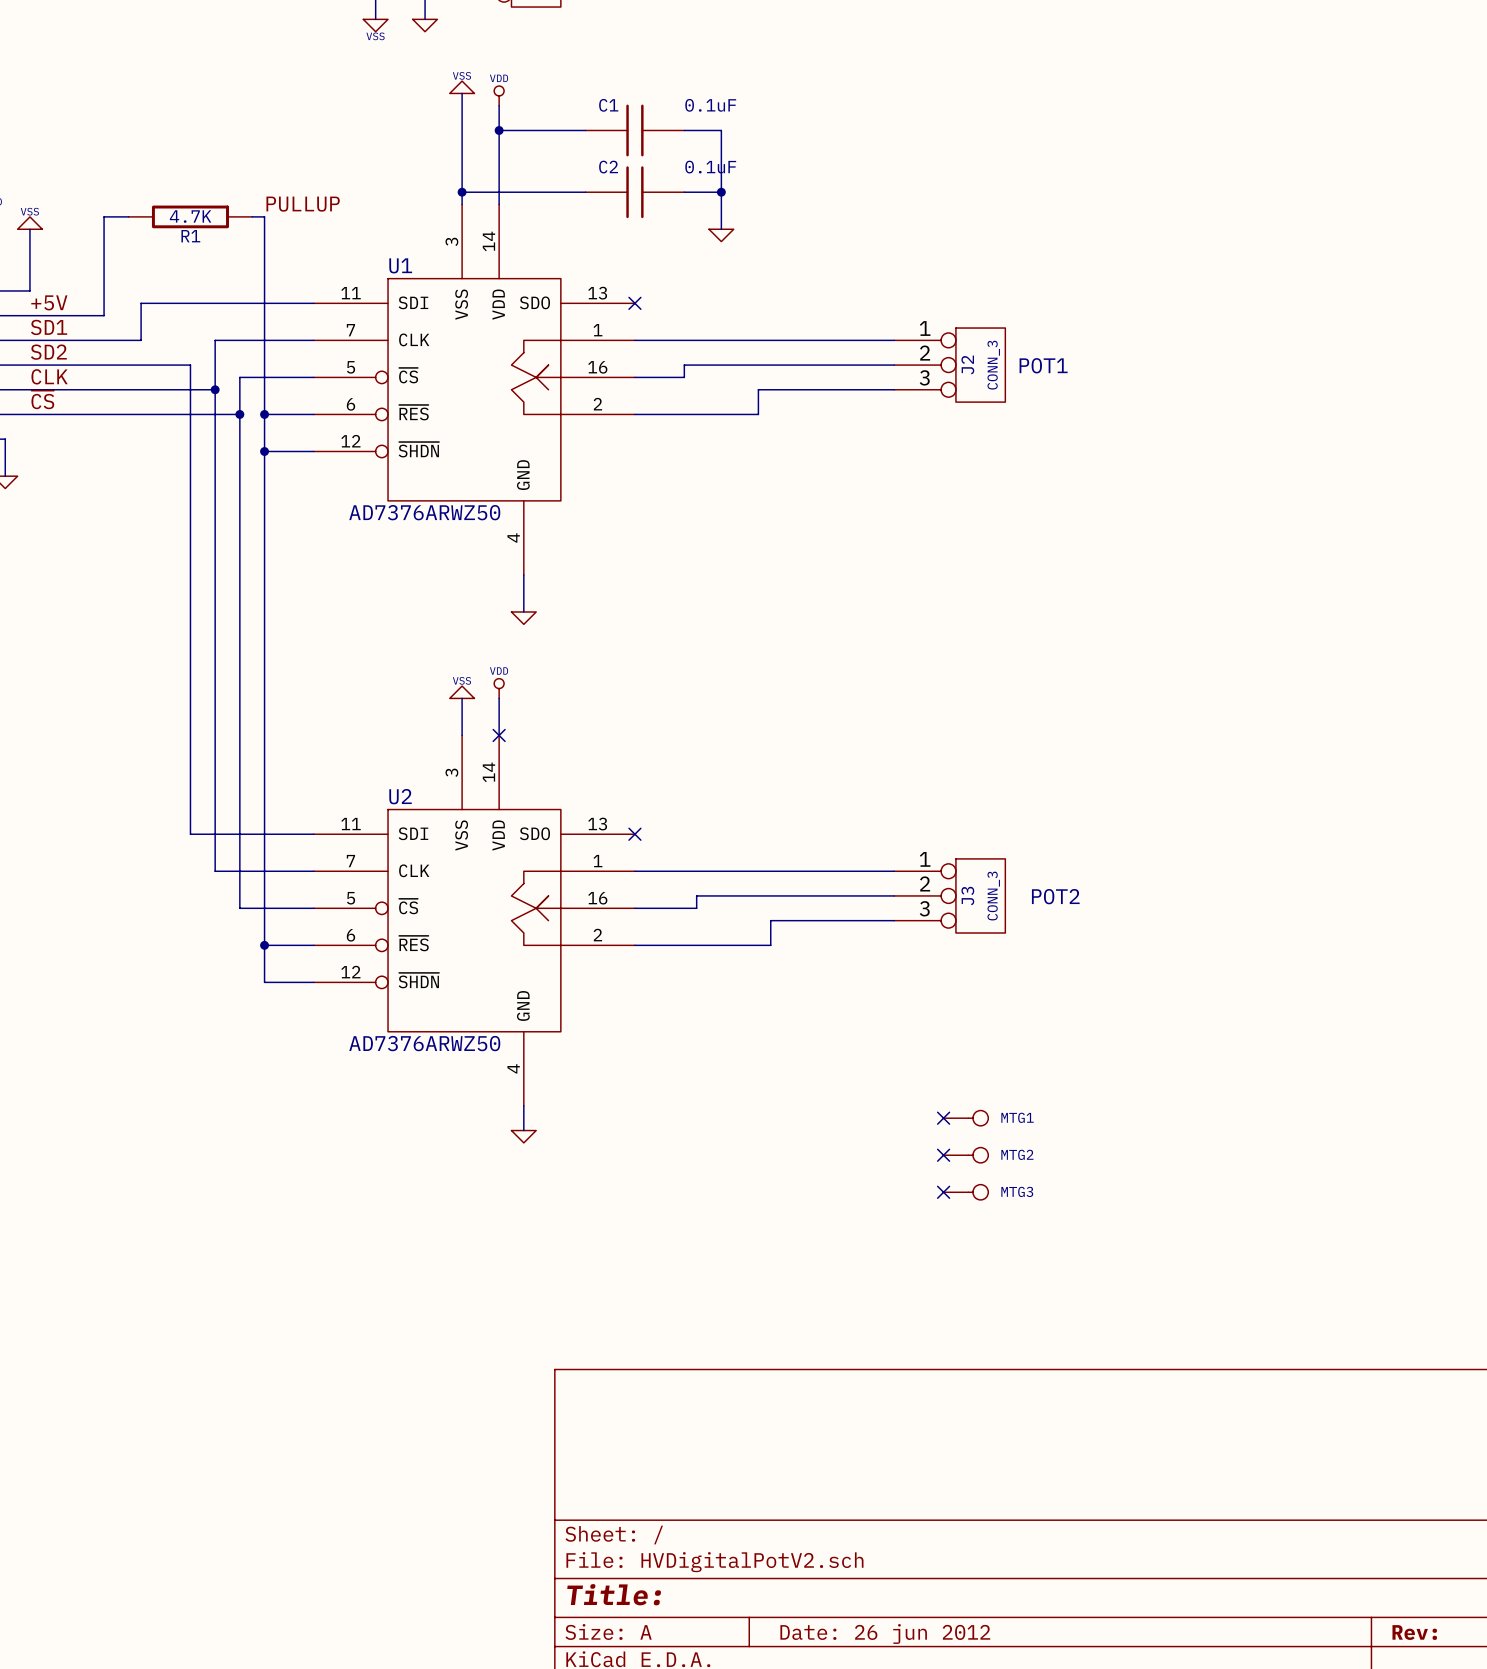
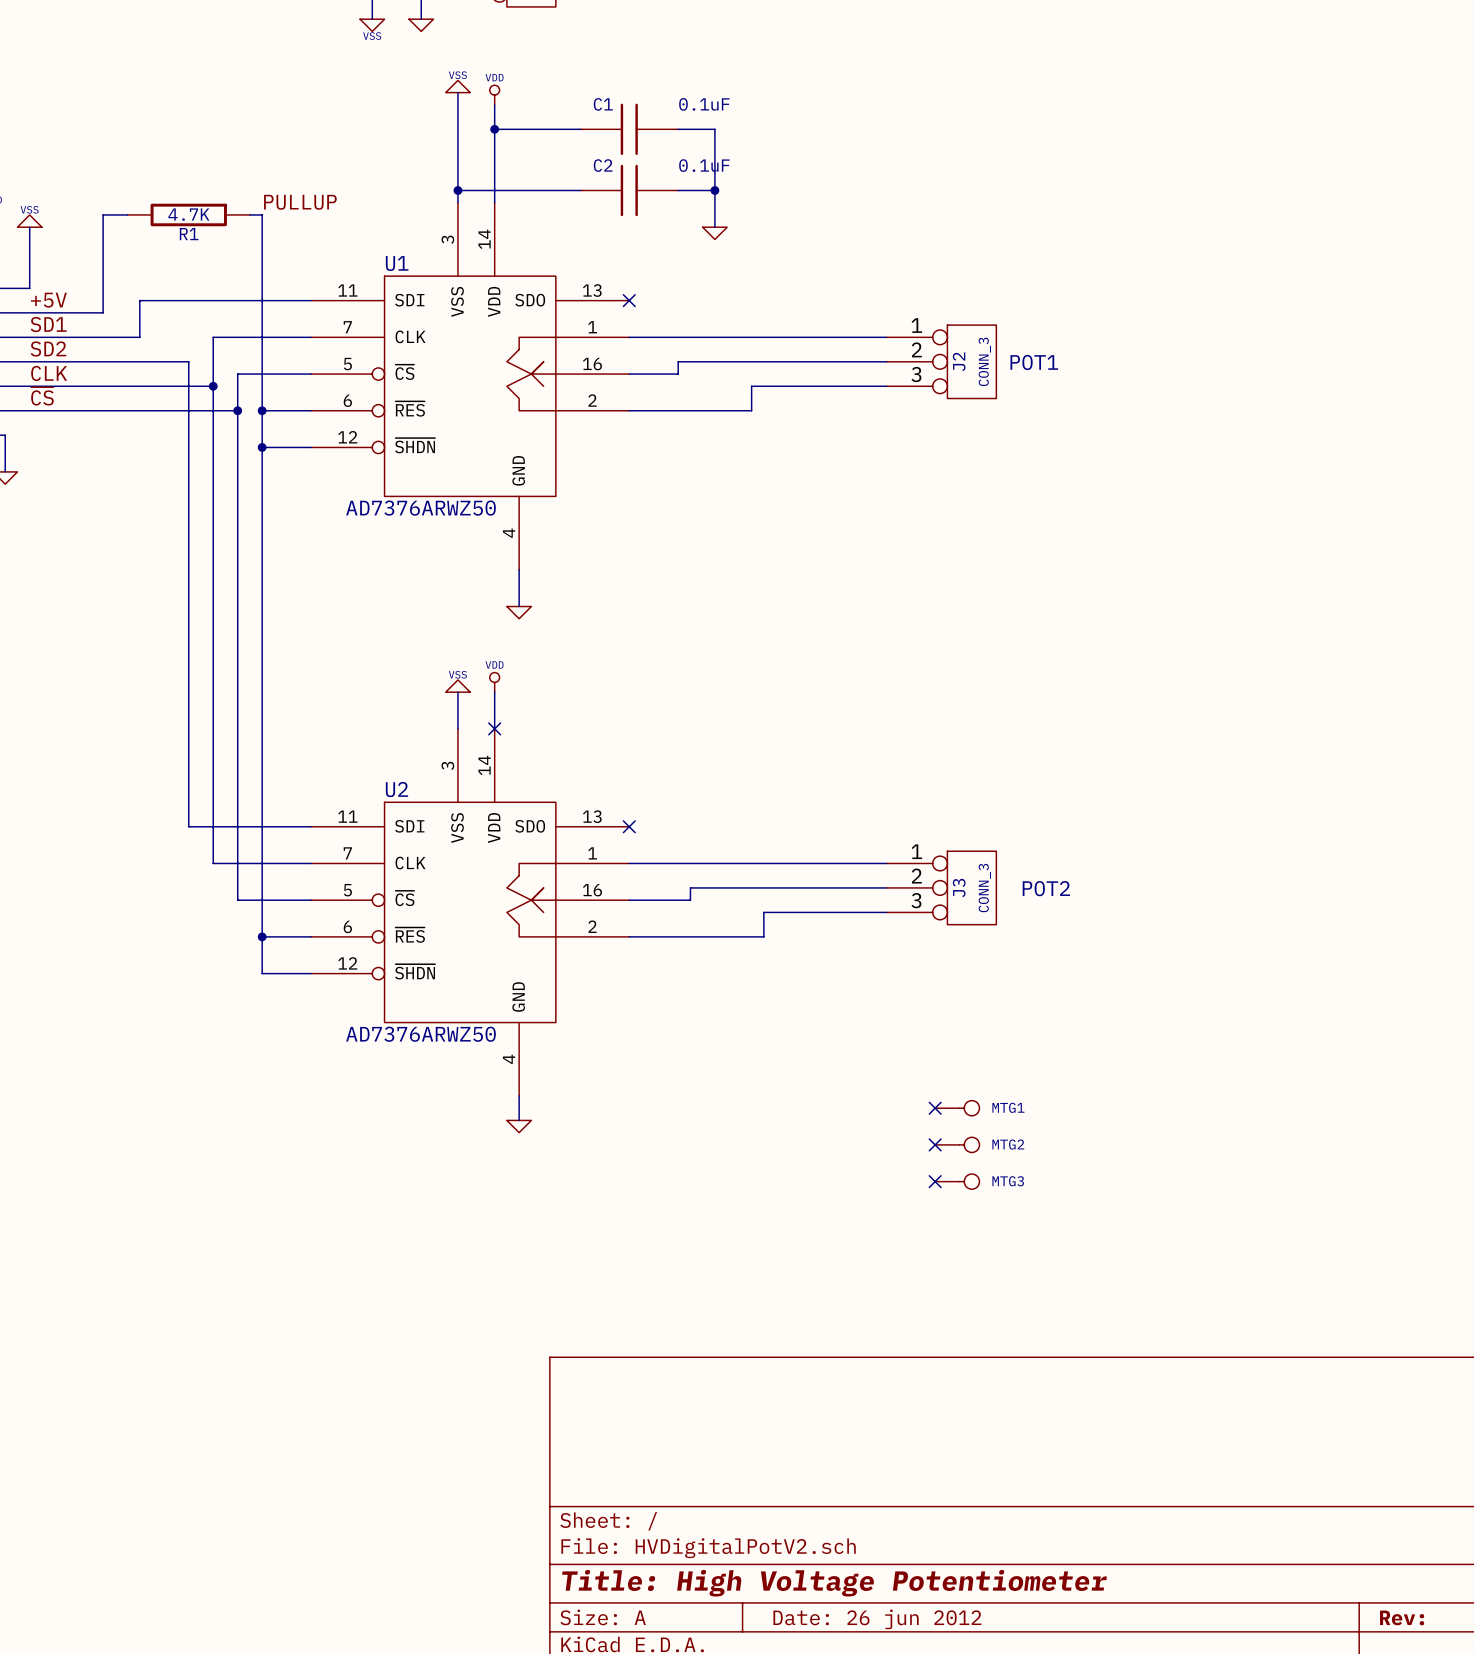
title block: Title: (614, 1594) -> Title: High Voltage Potentiometer (834, 1583)

